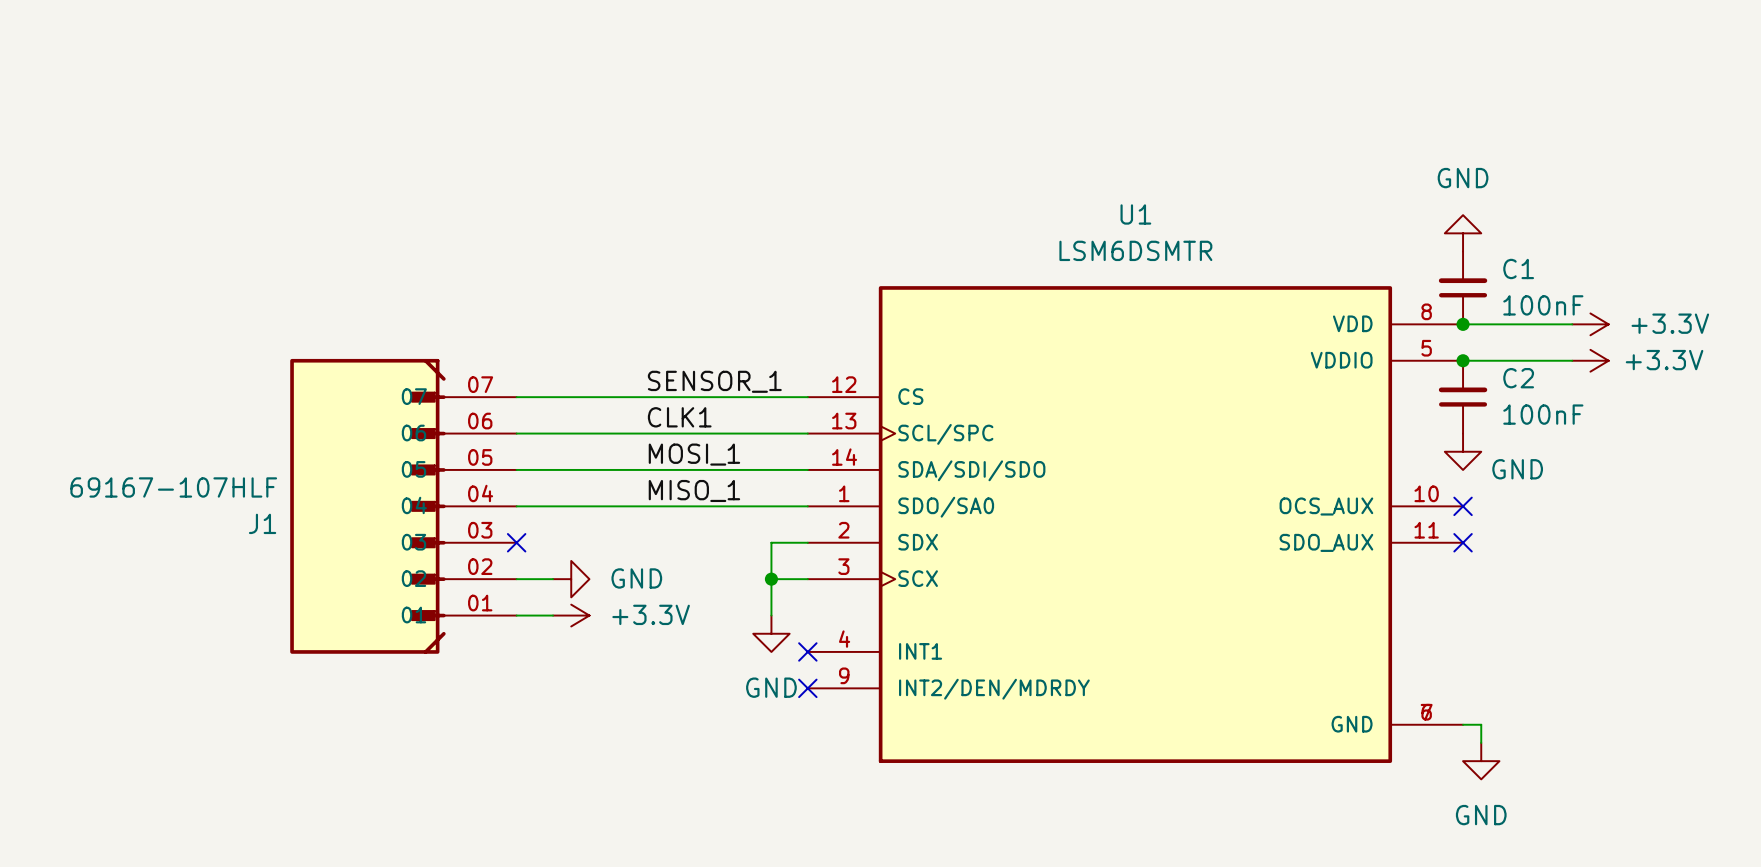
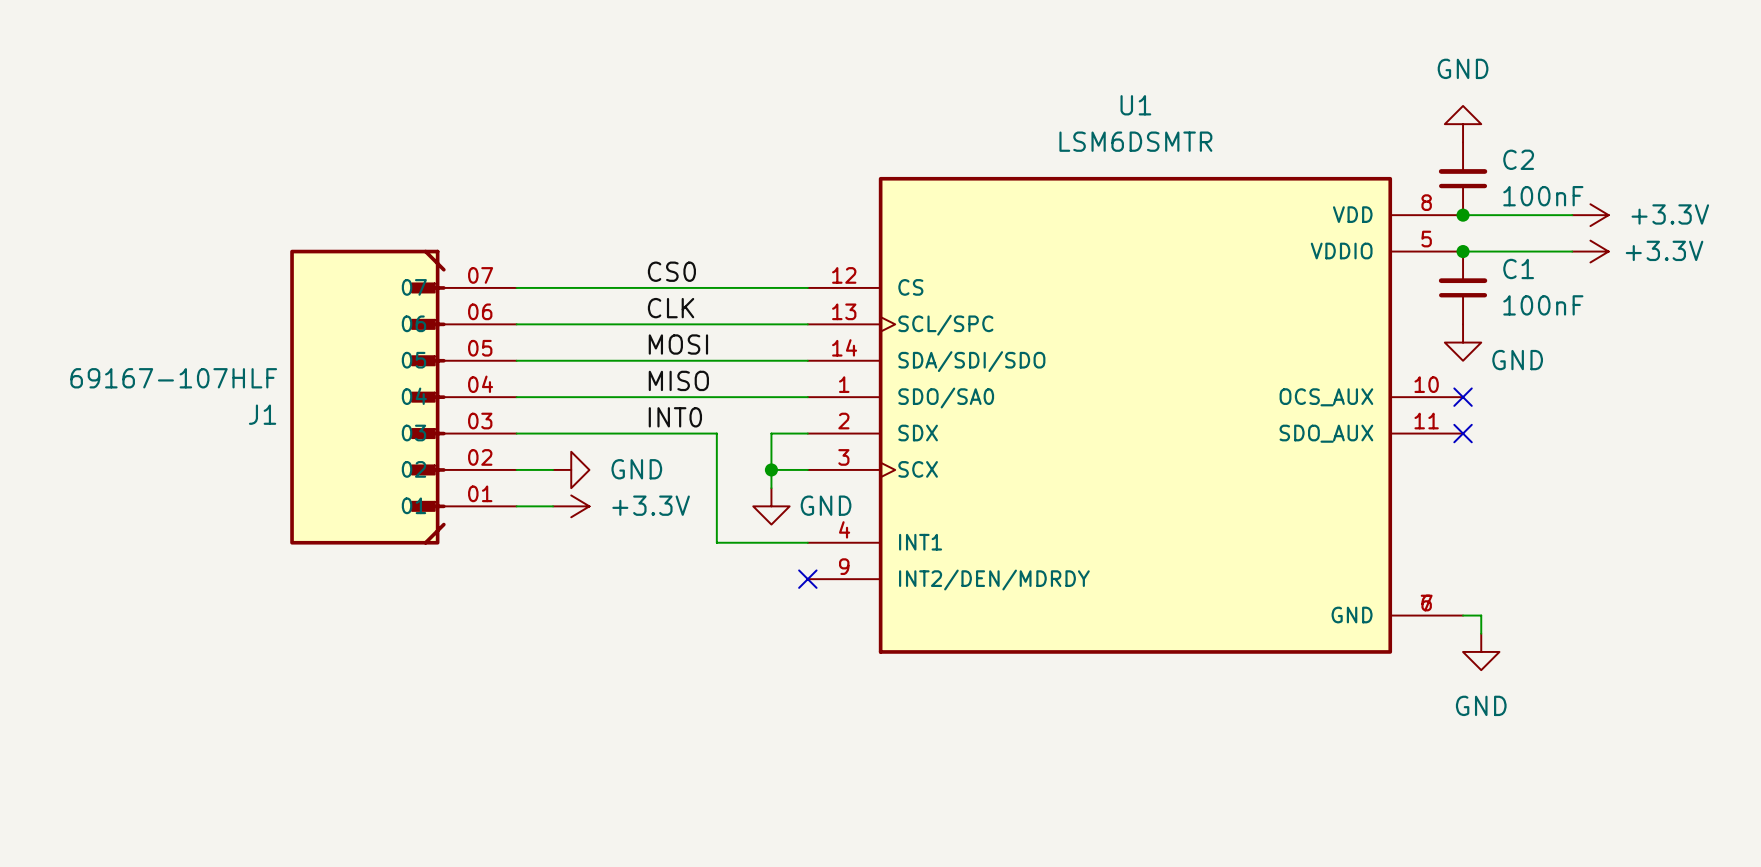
power symbol: none -> GND (1463, 124)
junction: none -> (1463, 215)
power symbol: none -> +3.3V (1590, 215)
power symbol: GND (1463, 233) -> none
junction: none -> (1463, 251)
power symbol: none -> +3.3V (1590, 251)
label: none -> CS0 (671, 271)
wire: none -> (516, 287) (807, 287)
label: none -> CLK (671, 308)
wire: none -> (516, 324) (807, 324)
wire: (1463, 324) (1572, 324) -> (1463, 215) (1572, 215)
junction: (1463, 324) -> none
power symbol: +3.3V (1590, 324) -> none
power symbol: none -> GND (1463, 342)
label: none -> MOSI (678, 344)
wire: none -> (516, 360) (807, 360)
wire: (1463, 360) (1572, 360) -> (1463, 251) (1572, 251)
junction: (1463, 360) -> none
power symbol: +3.3V (1590, 360) -> none
label: SENSOR_1 (714, 381) -> MISO (678, 380)
no-connect mark: none -> (1463, 397)
C2 position: (1463, 397) -> (1463, 178)
label: CLK1 (679, 417) -> INT0 (675, 417)
wire: (716, 433) (771, 433) -> (771, 488) (771, 433)
no-connect mark: none -> (1463, 433)
power symbol: GND (1463, 451) -> none
label: MOSI_1 (694, 454) -> none
wire: (553, 469) (771, 469) -> none
power symbol: none -> GND (571, 469)
junction: none -> (771, 469)
label: MISO_1 (694, 490) -> none
J1 position: (403, 506) -> (403, 397)
wire: (553, 506) (807, 506) -> none
power symbol: none -> GND (771, 506)
no-connect mark: (1463, 506) -> none
U1 position: (1135, 524) -> (1135, 415)
no-connect mark: (516, 542) -> none
wire: (771, 542) (771, 615) -> (771, 542) (716, 542) (716, 433)
no-connect mark: (1463, 542) -> none
wire: (516, 579) (553, 579) -> none
power symbol: GND (571, 579) -> none
wire: (771, 579) (807, 579) -> none
junction: (771, 579) -> none
no-connect mark: none -> (807, 579)
wire: (516, 615) (553, 615) -> none
power symbol position: +3.3V (571, 615) -> +3.3V (571, 506)
power symbol: GND (771, 633) -> none
no-connect mark: (807, 651) -> none
power symbol: none -> GND (1481, 651)
no-connect mark: (807, 688) -> none
wire: (1463, 724) (1481, 724) (1481, 742) -> (1463, 615) (1481, 615) (1481, 633)
power symbol: GND (1481, 761) -> none

